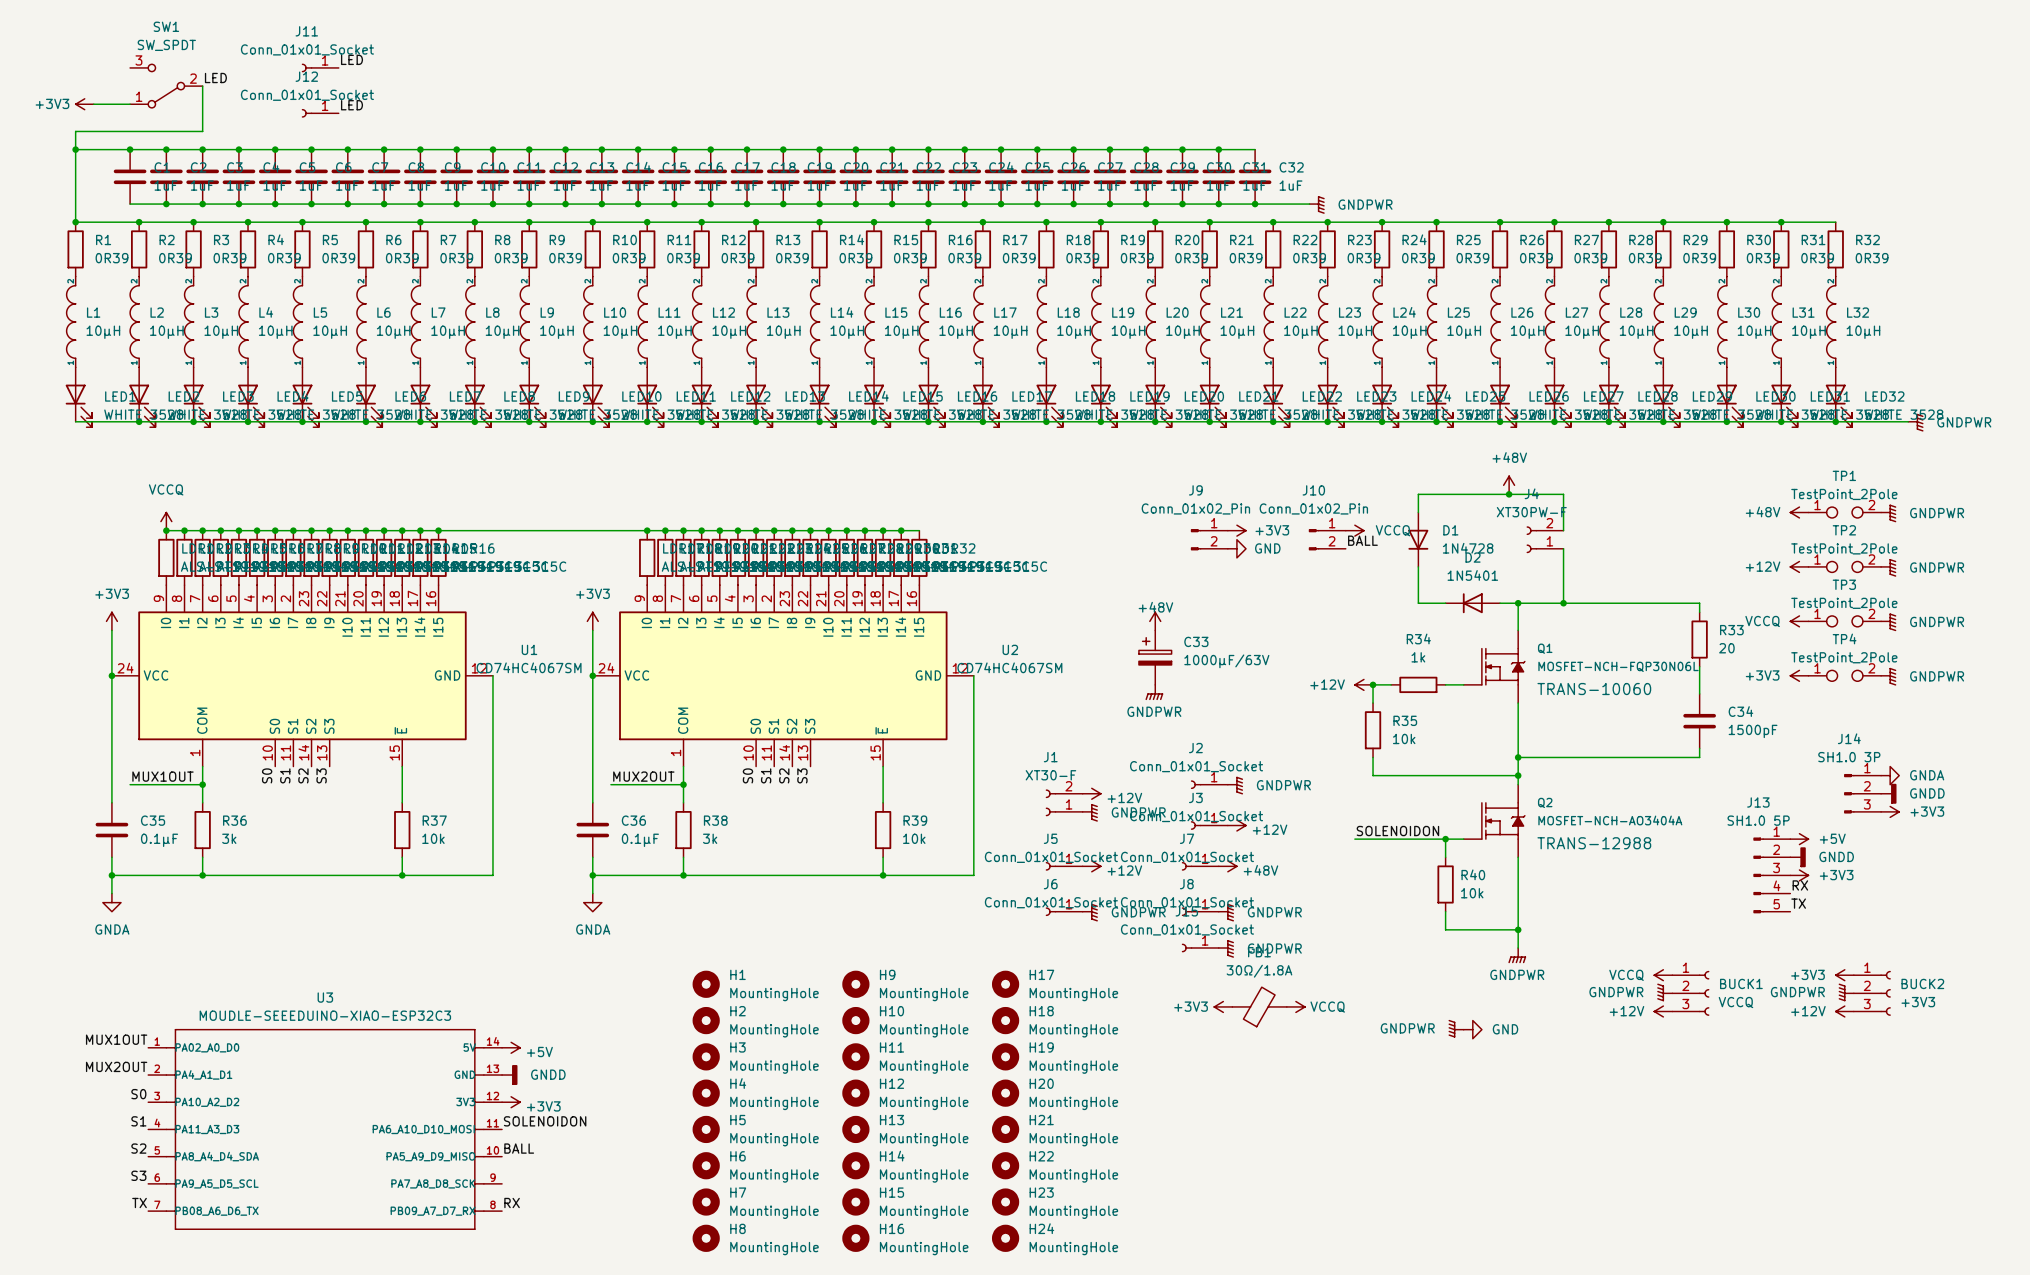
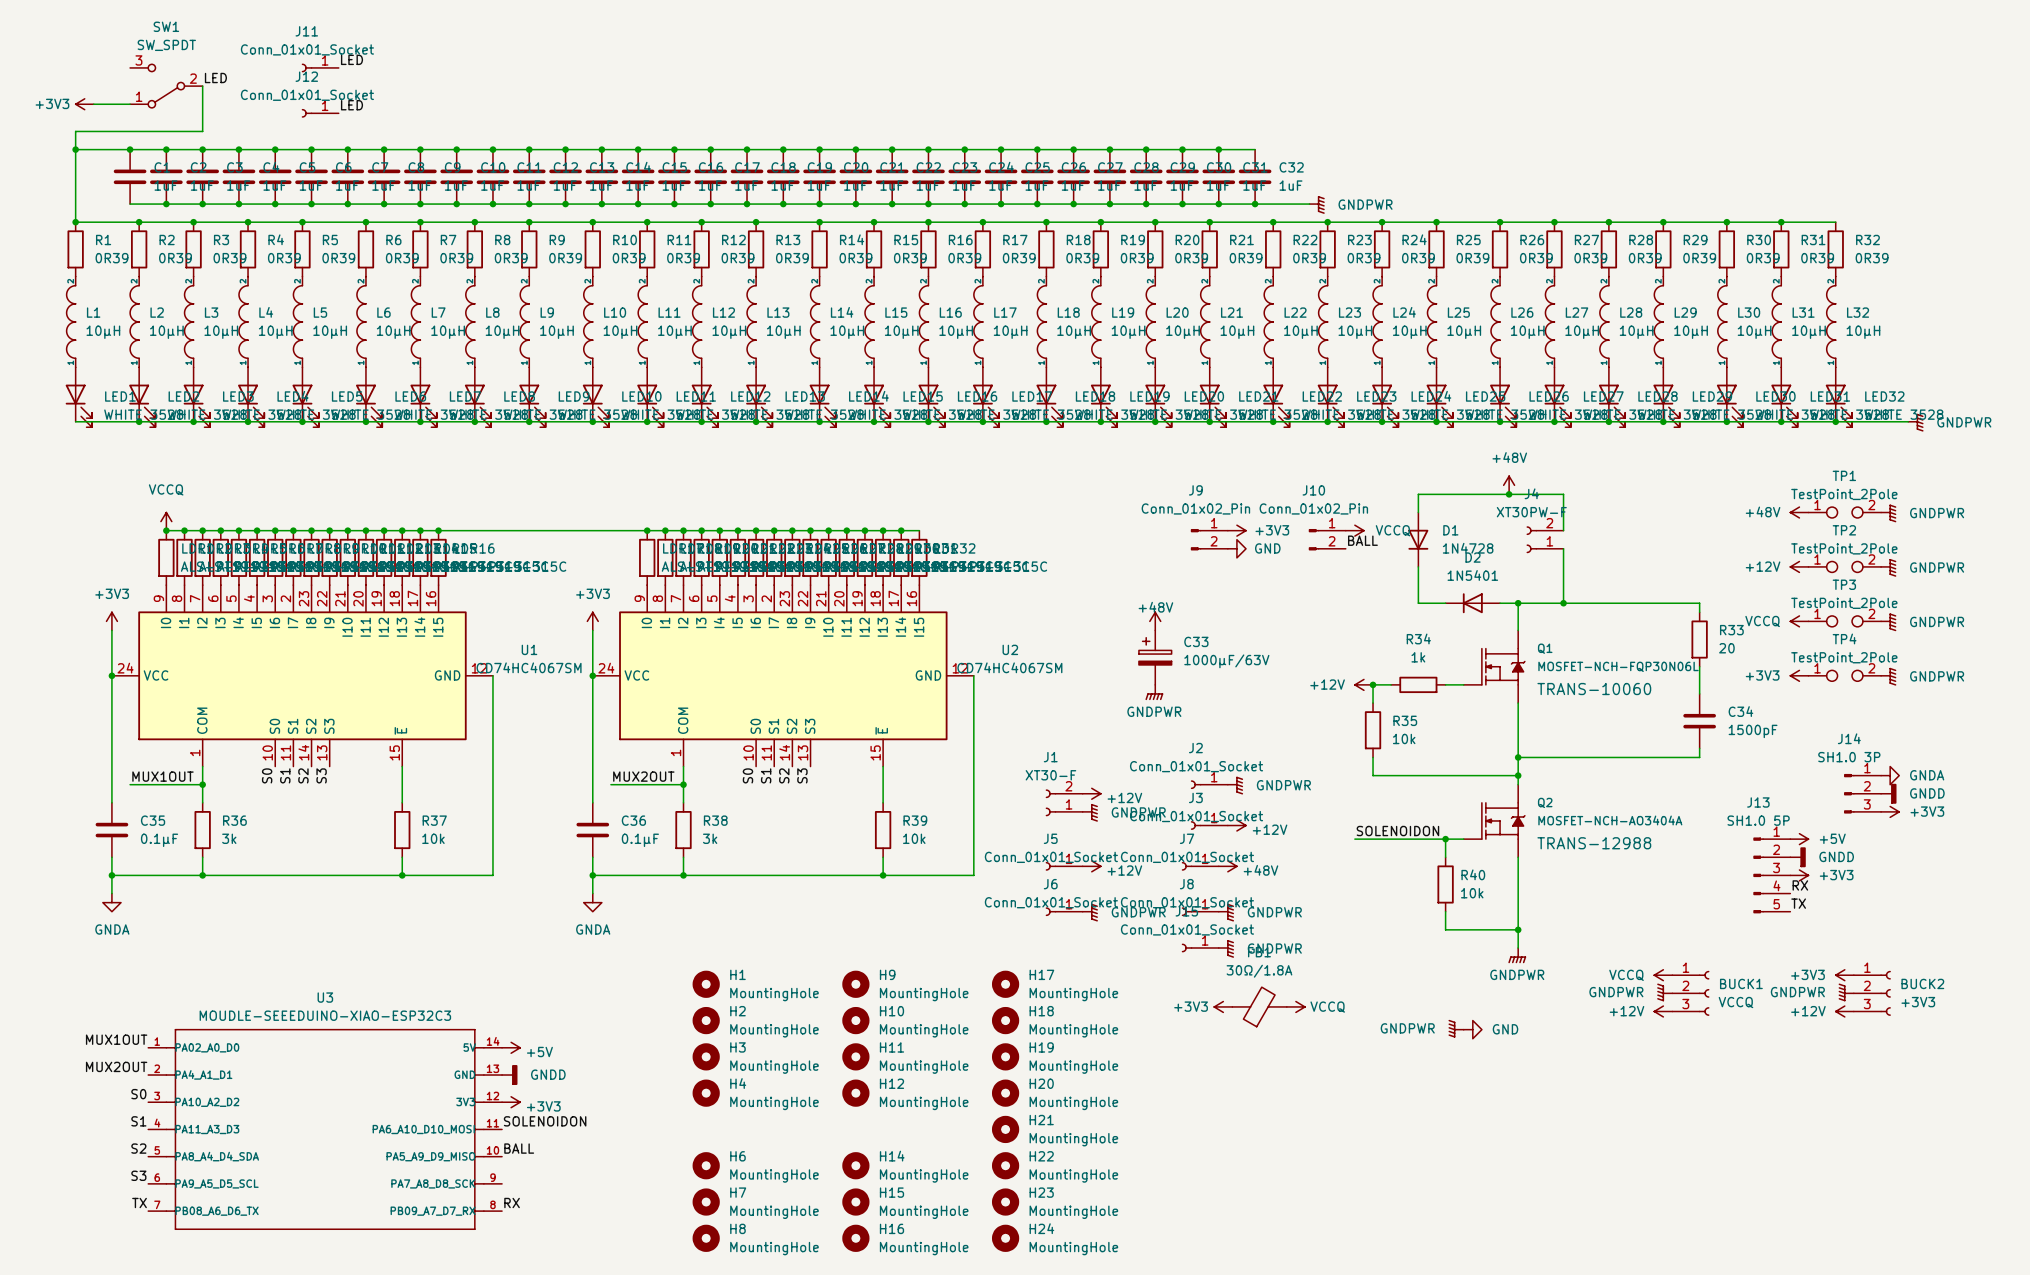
H5: MountingHole (706, 1129) -> none
H13: MountingHole (855, 1129) -> none

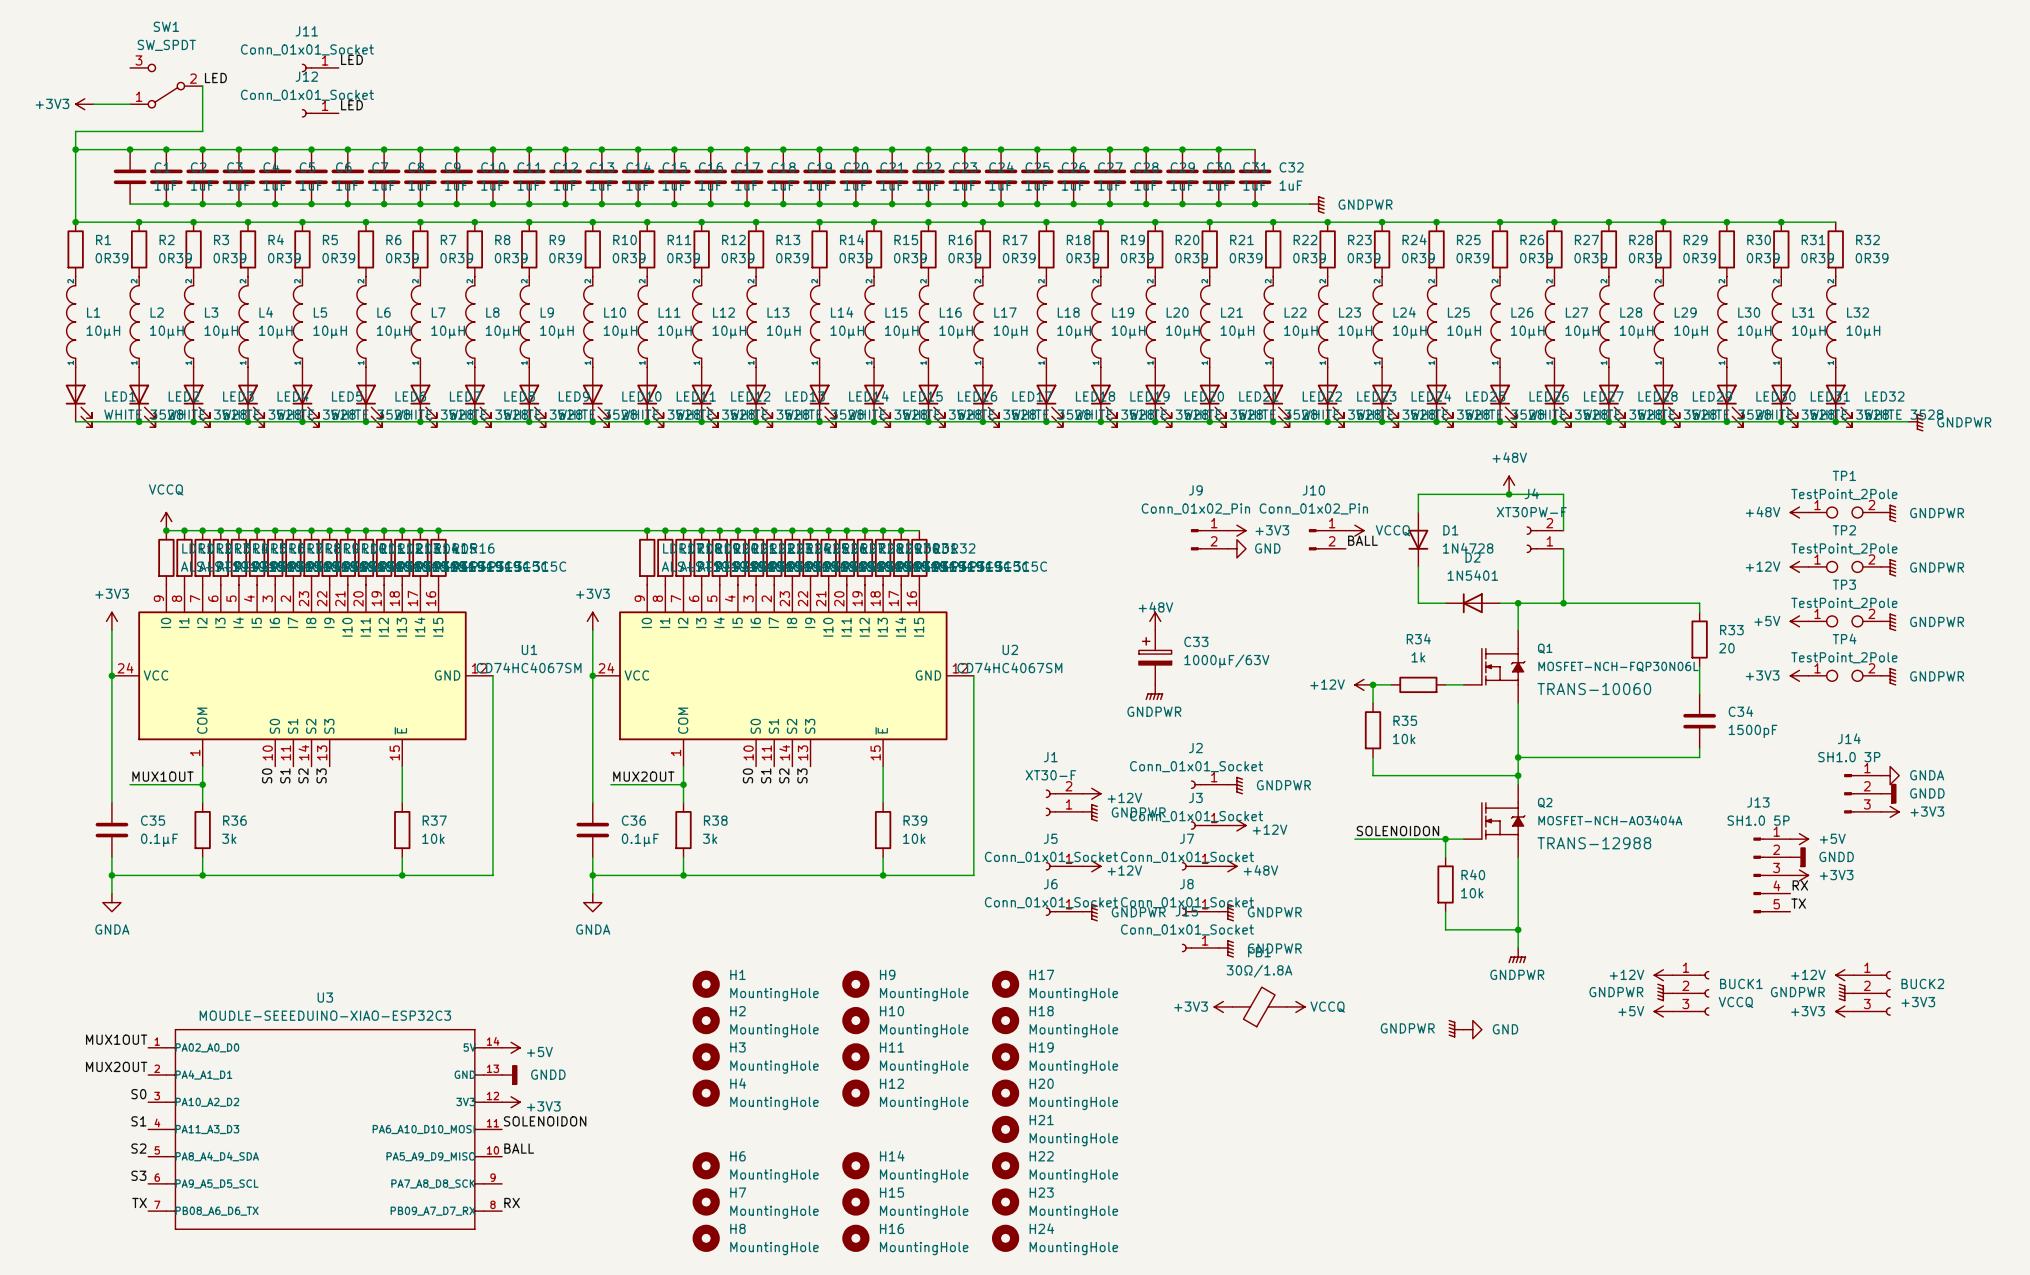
power symbol: VCCQ (1799, 621) -> +5V (1799, 621)
power symbol: VCCQ (1663, 975) -> +12V (1663, 975)
power symbol: +3V3 (1844, 975) -> +12V (1844, 975)
power symbol: +12V (1663, 1011) -> +5V (1663, 1011)
power symbol: +12V (1844, 1011) -> +3V3 (1844, 1011)

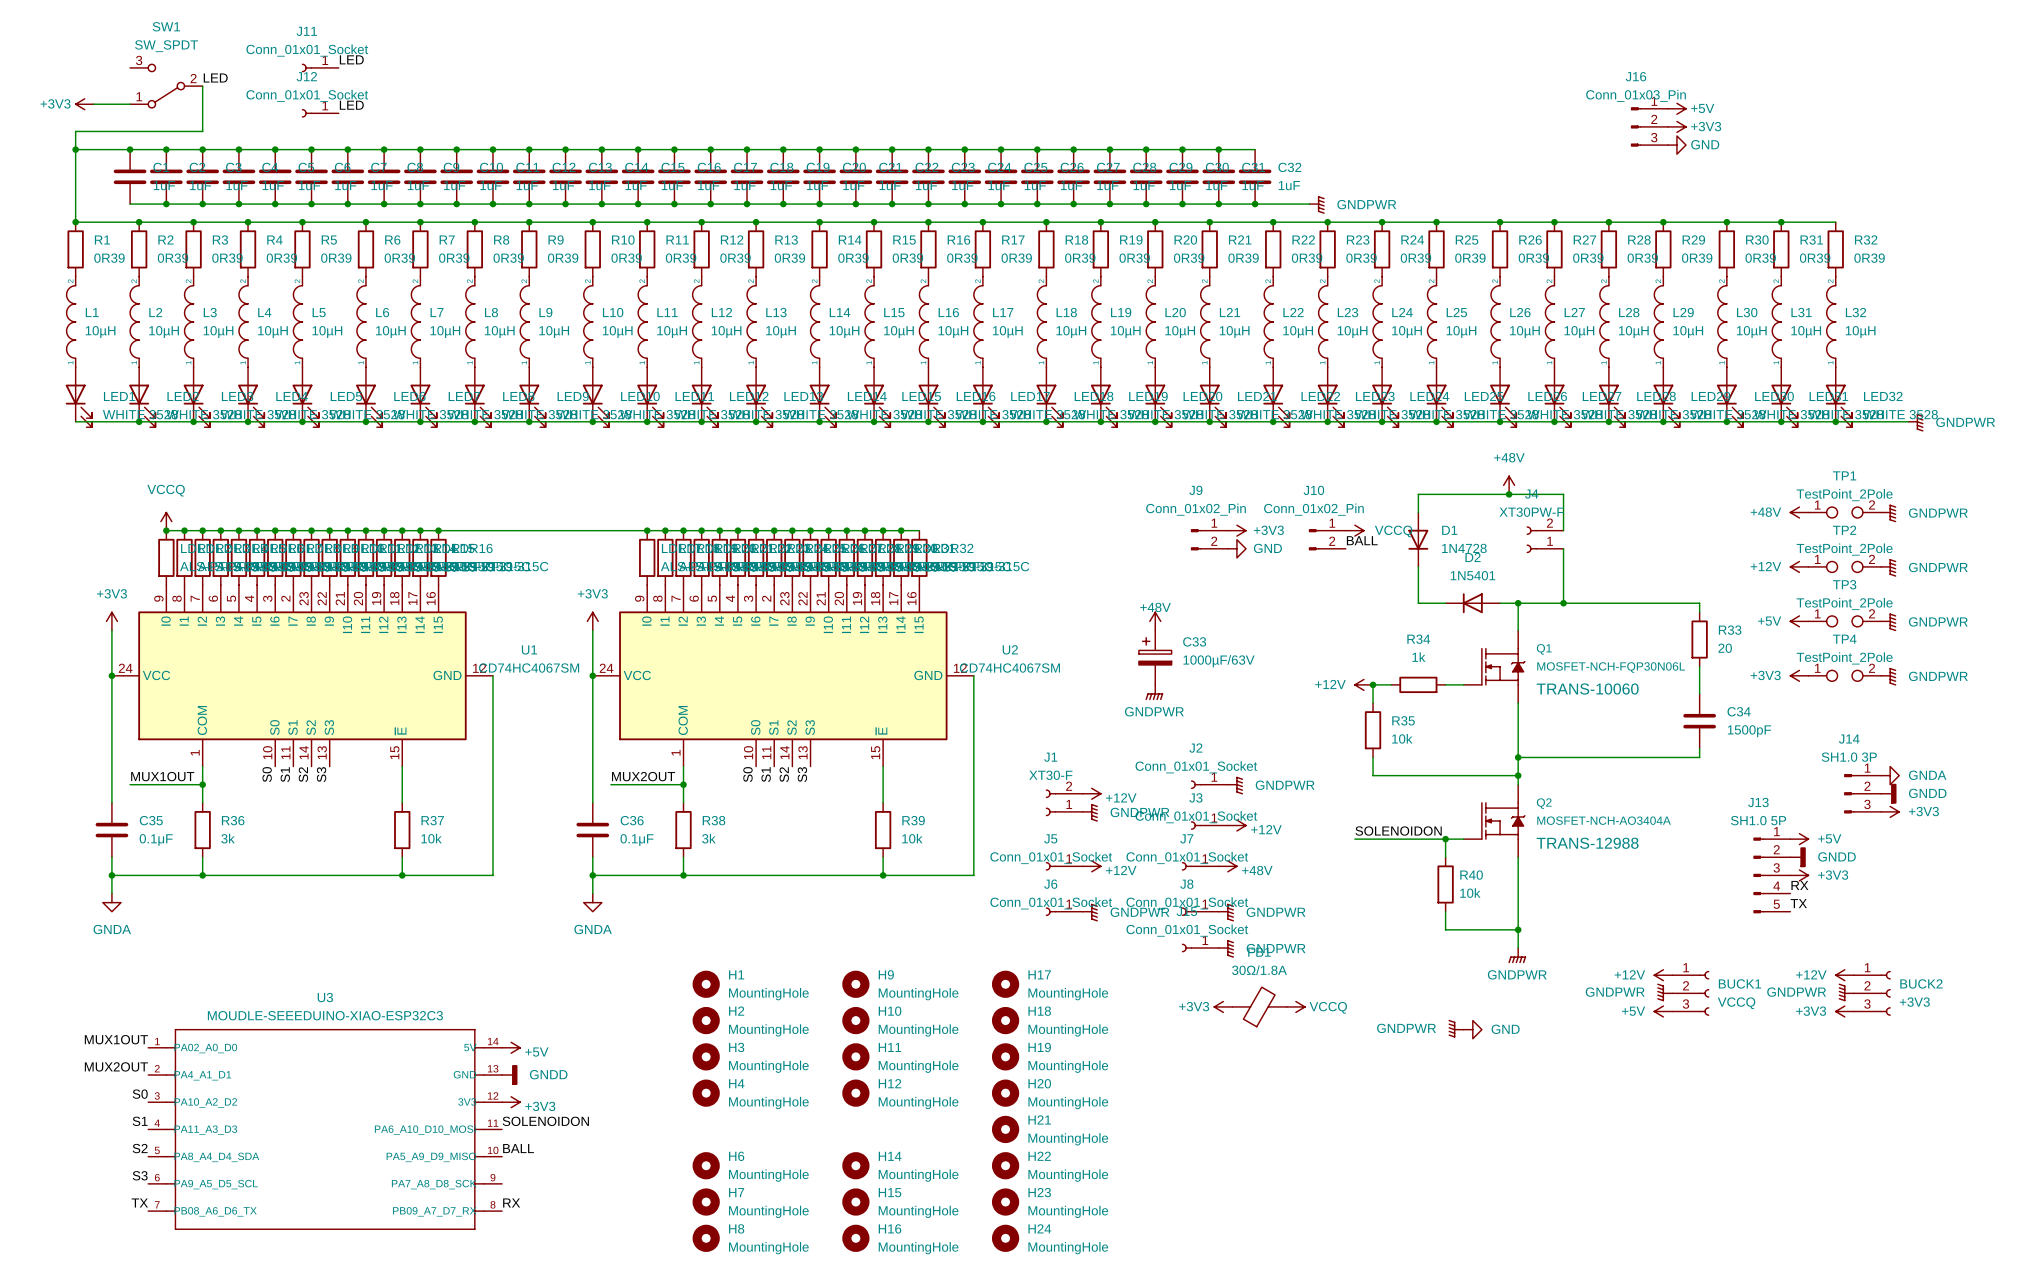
power symbol: none -> +5V (1676, 108)
J16: none -> Conn_01x03_Pin (1649, 126)
power symbol: none -> +3V3 (1676, 126)
power symbol: none -> GND (1676, 145)

